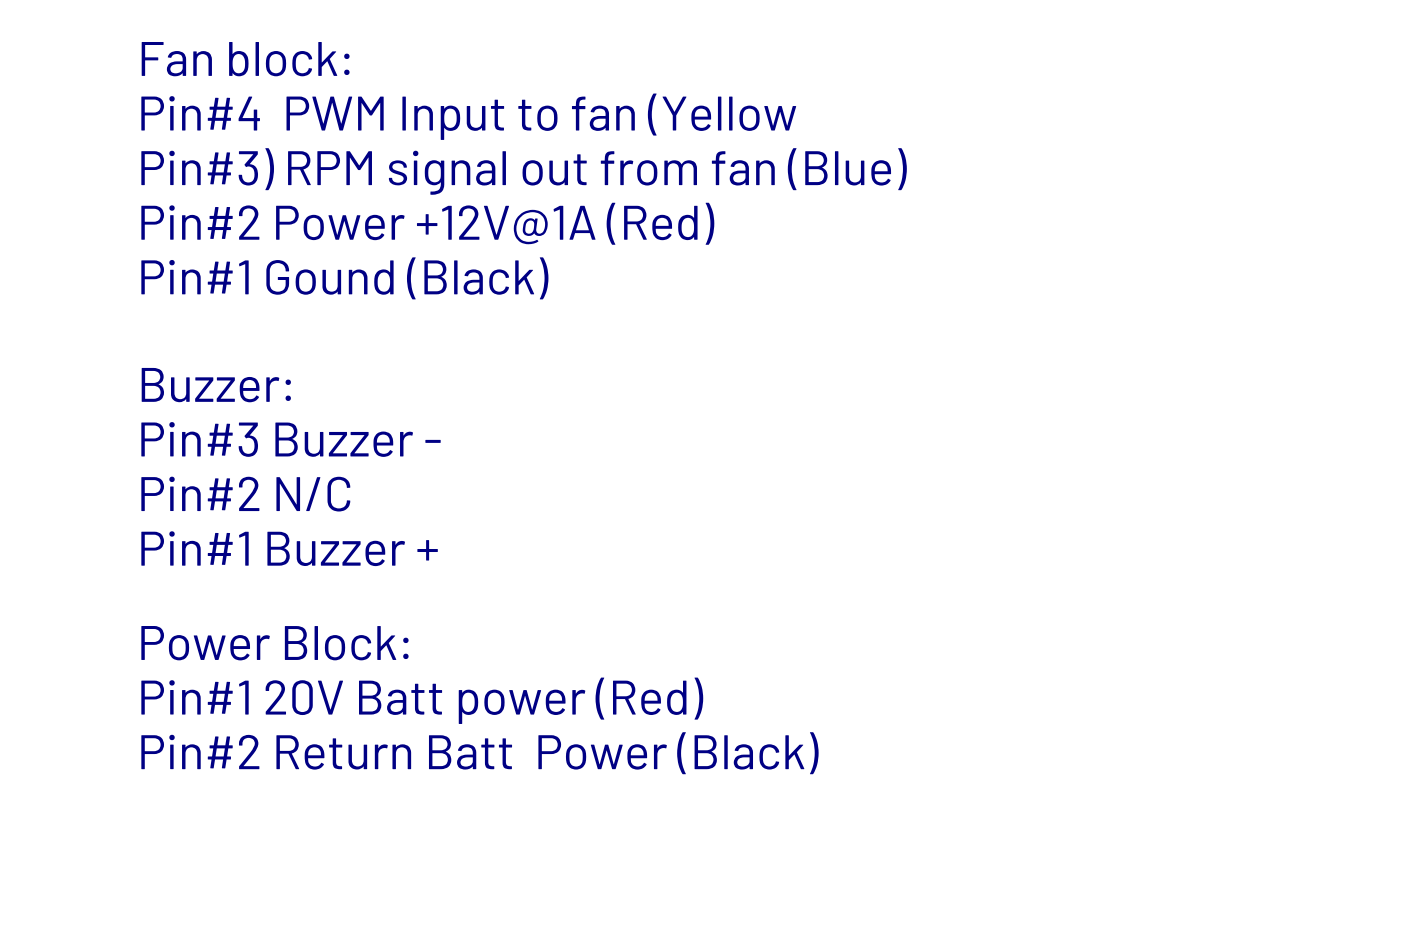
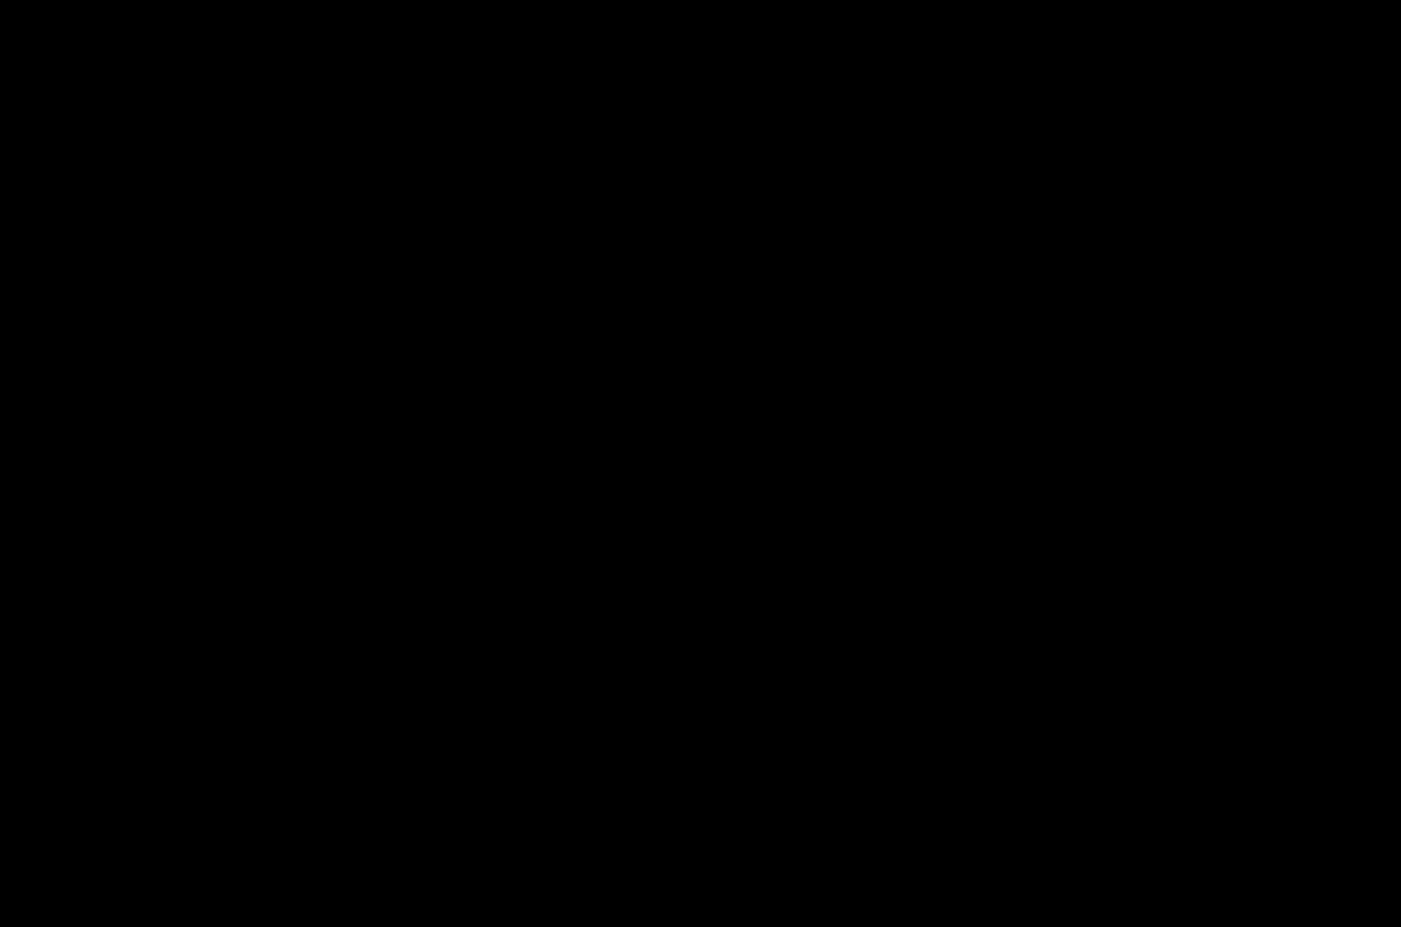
text: Fan block: (245, 59) -> none
text: Pin#4 PWM Input to fan (Yellow (468, 116) -> none
text: Pin#3) RPM signal out from fan (Blue) (524, 171) -> none
text: Pin#2 Power +12V@1A (Red) (427, 223) -> none
text: Pin#1 Gound (Black) (344, 278) -> none
text: Buzzer: (216, 385) -> none
text: Pin#3 Buzzer - (291, 439) -> none
text: Pin#2 N/C (245, 494) -> none
text: Pin#1 Buzzer + (289, 548) -> none
text: Power Block: (274, 643) -> none
text: Pin#1 20V Batt power (Red) (422, 700) -> none
text: Pin#2 Return Batt Power (Black) (479, 753) -> none

